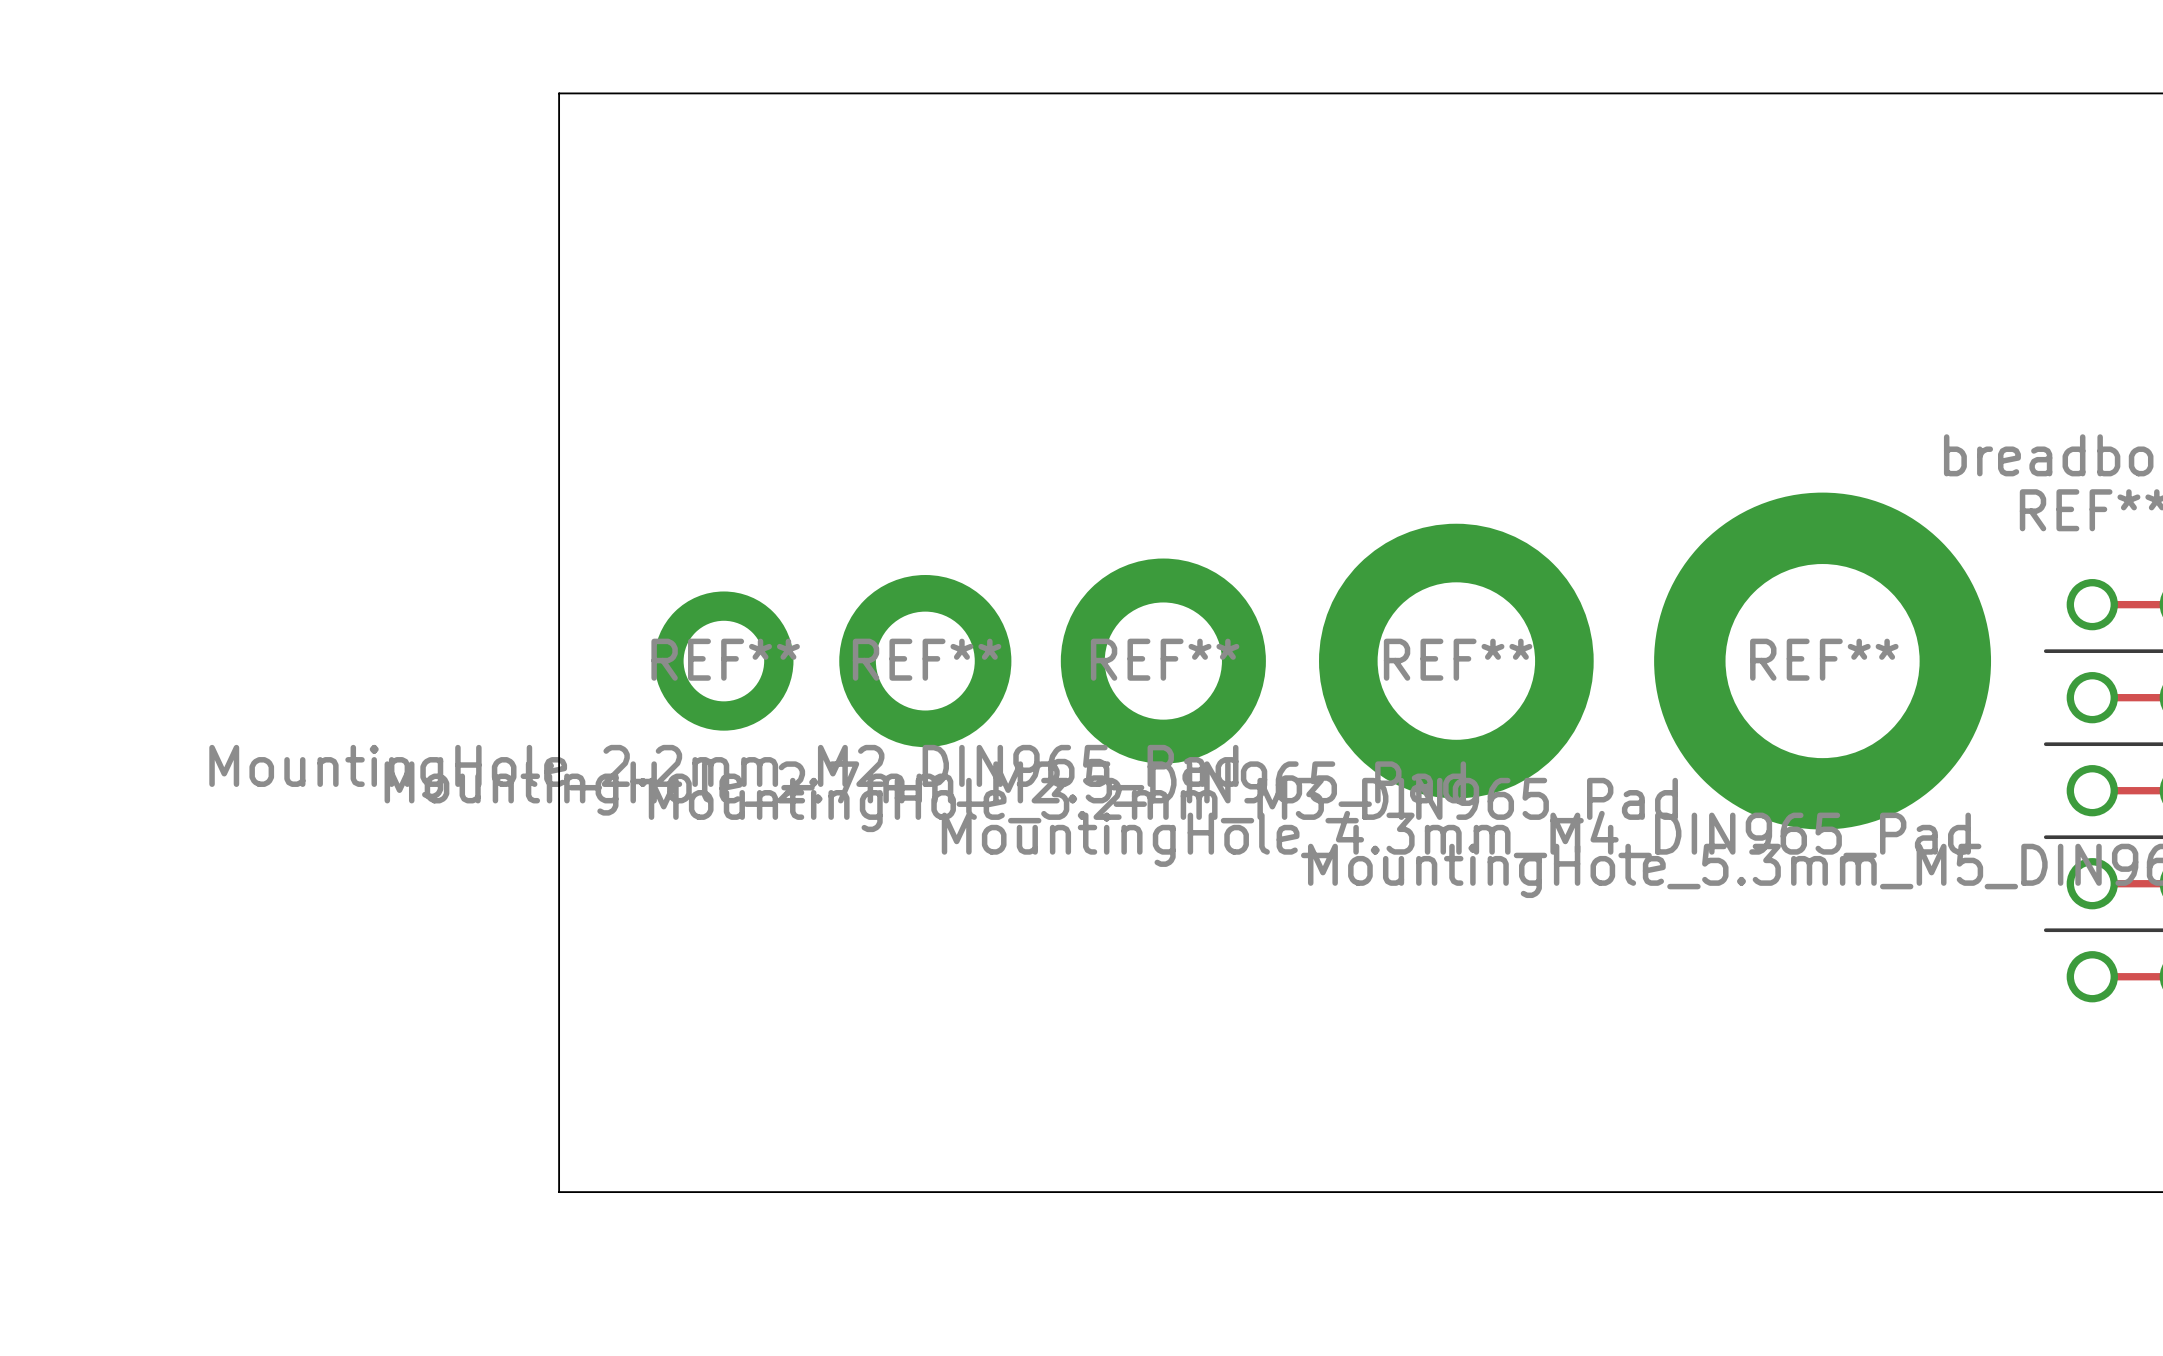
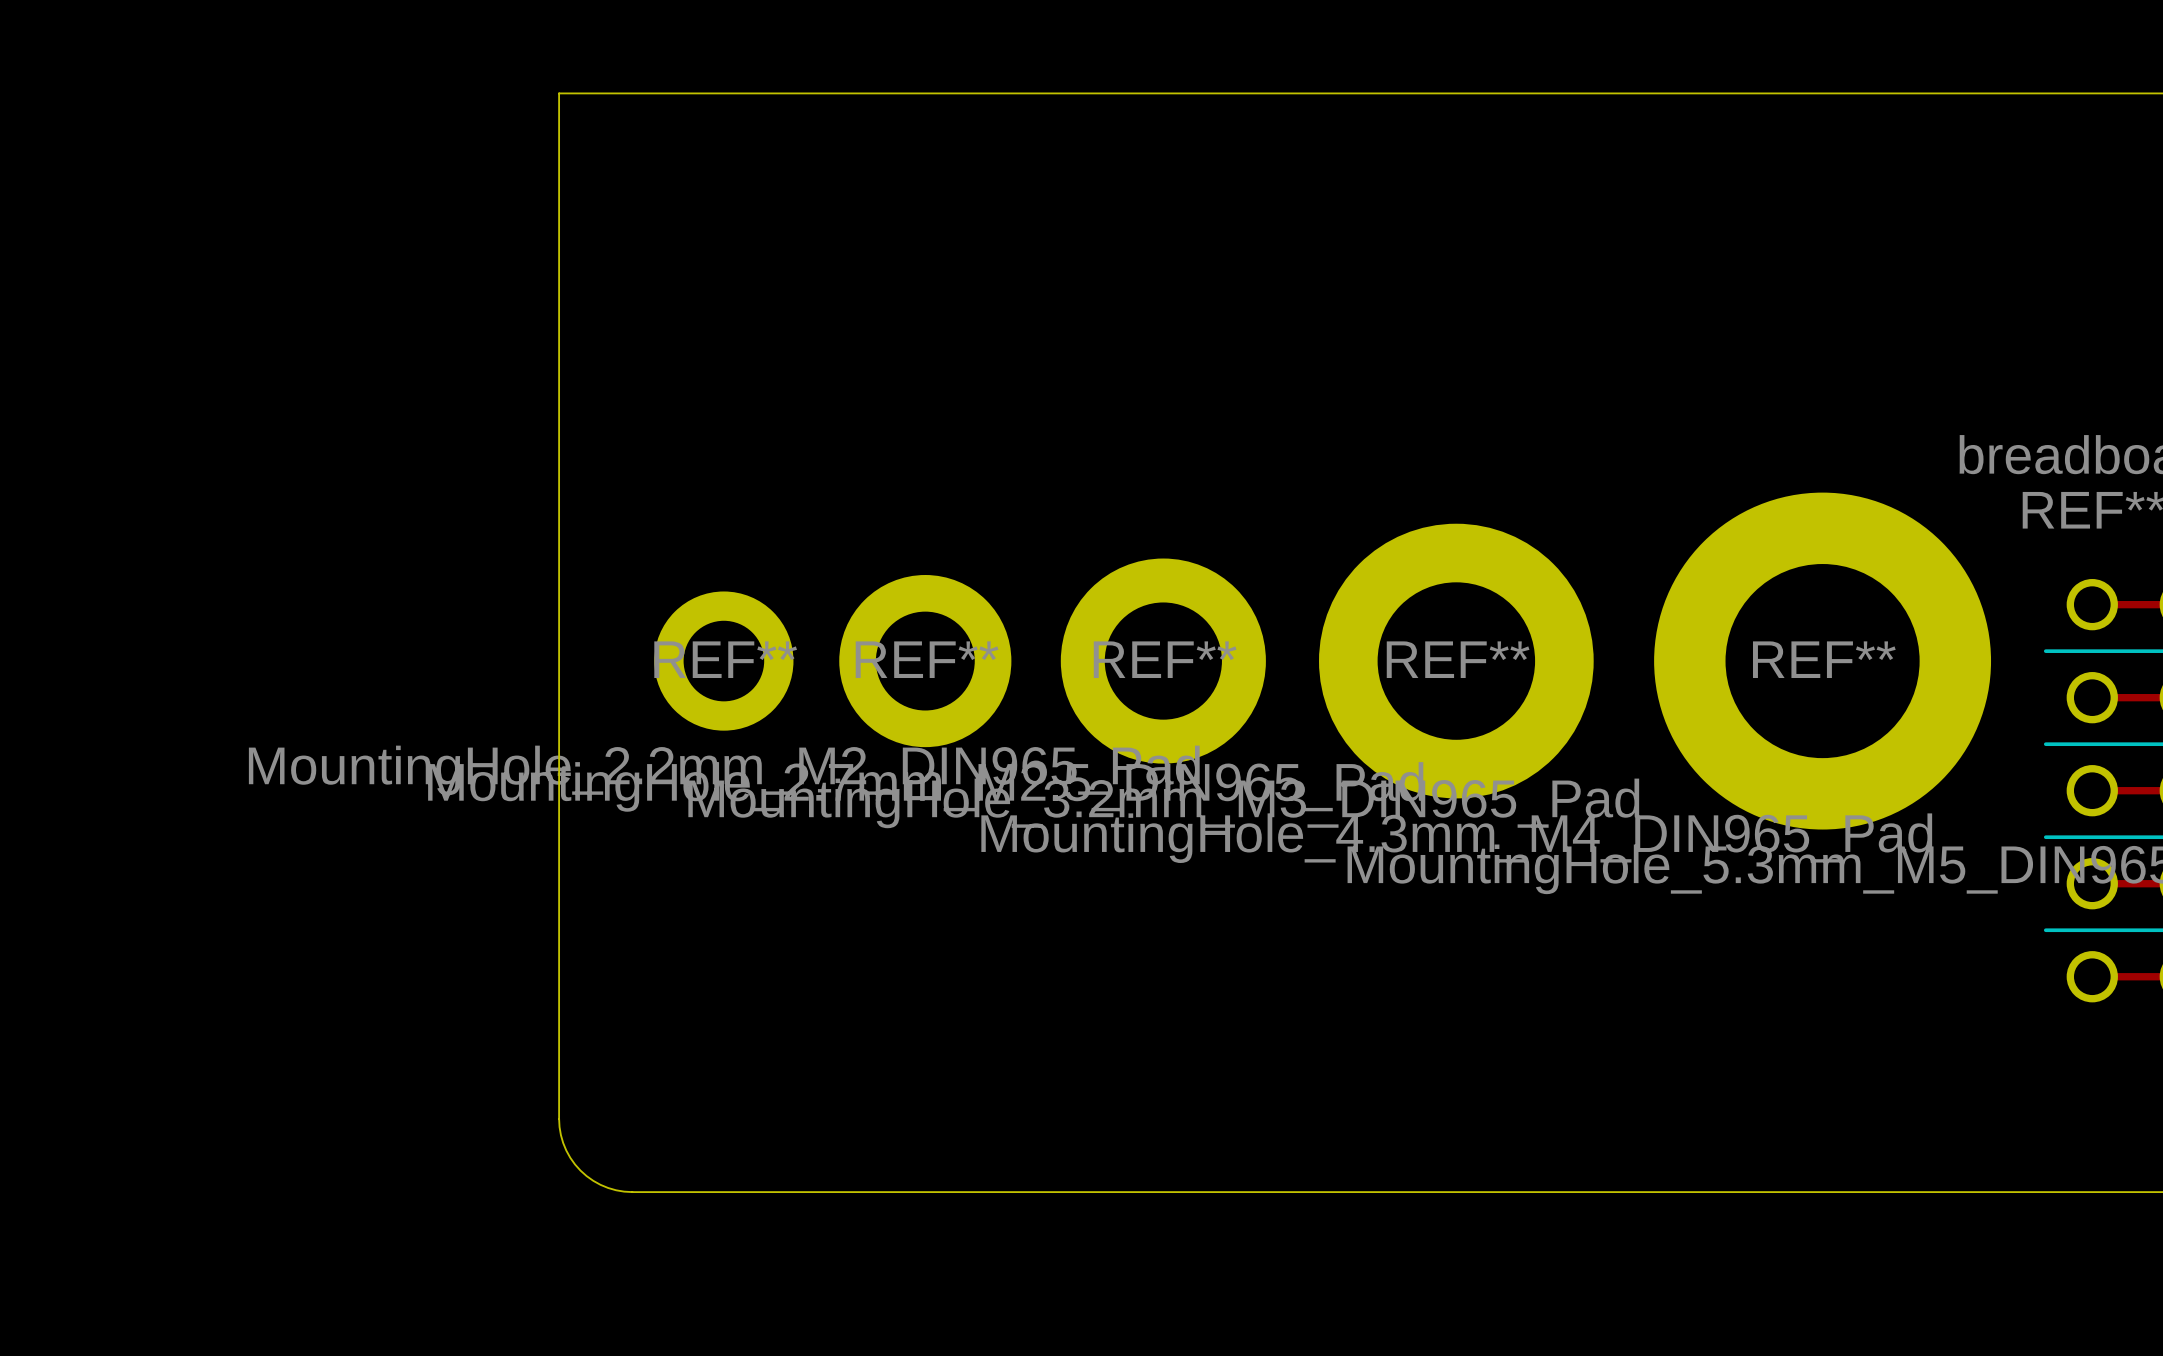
board edge: (559, 1118) (559, 1192) (632, 1192) -> (559, 1118) (560, 1135) (566, 1150) (580, 1170) (600, 1184) (616, 1190) (632, 1192)

